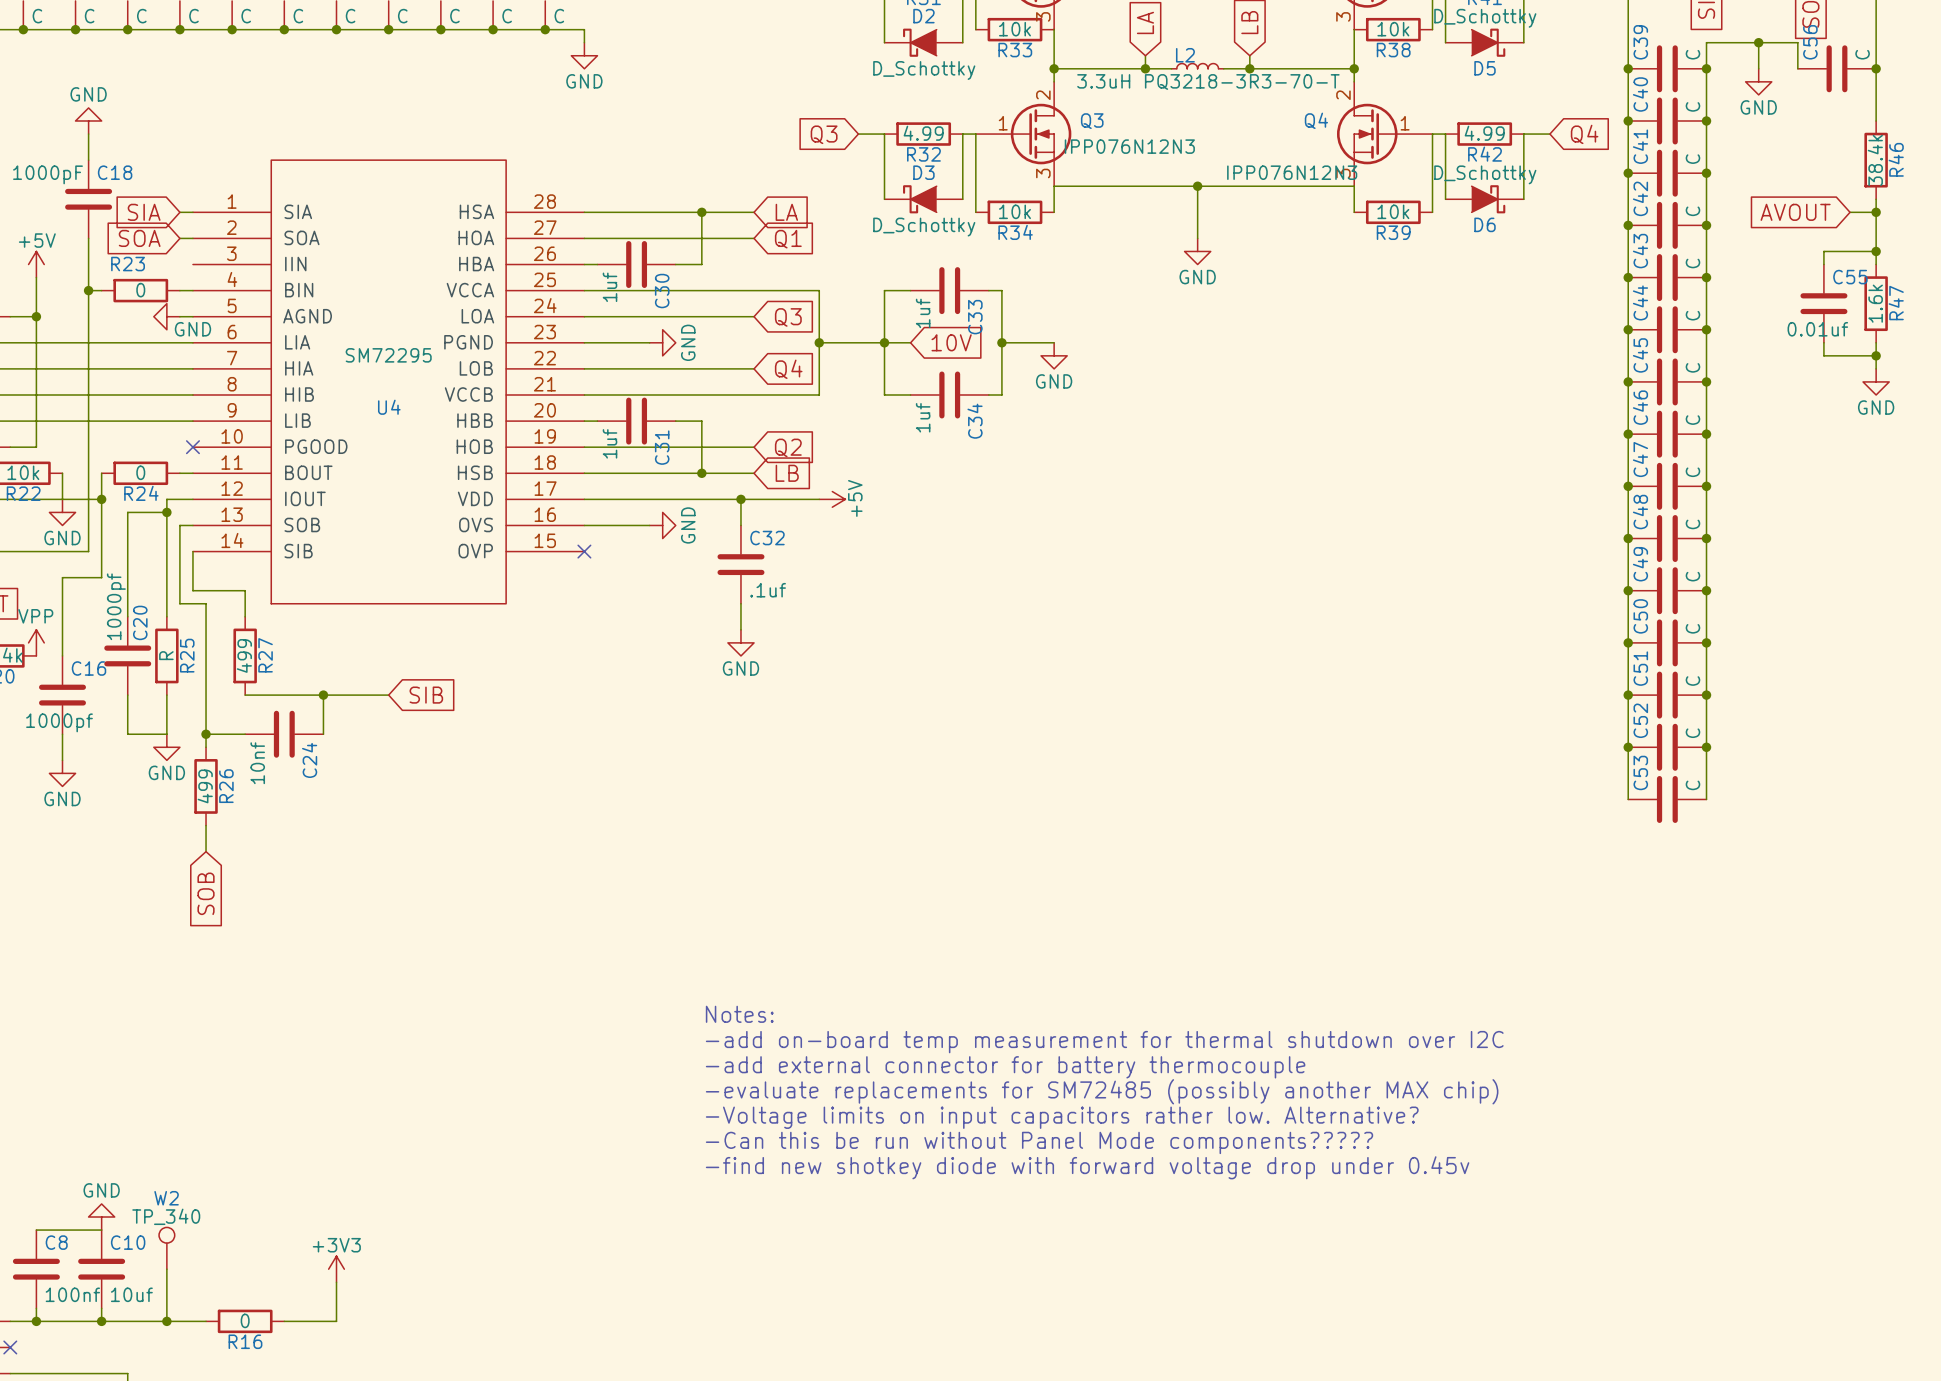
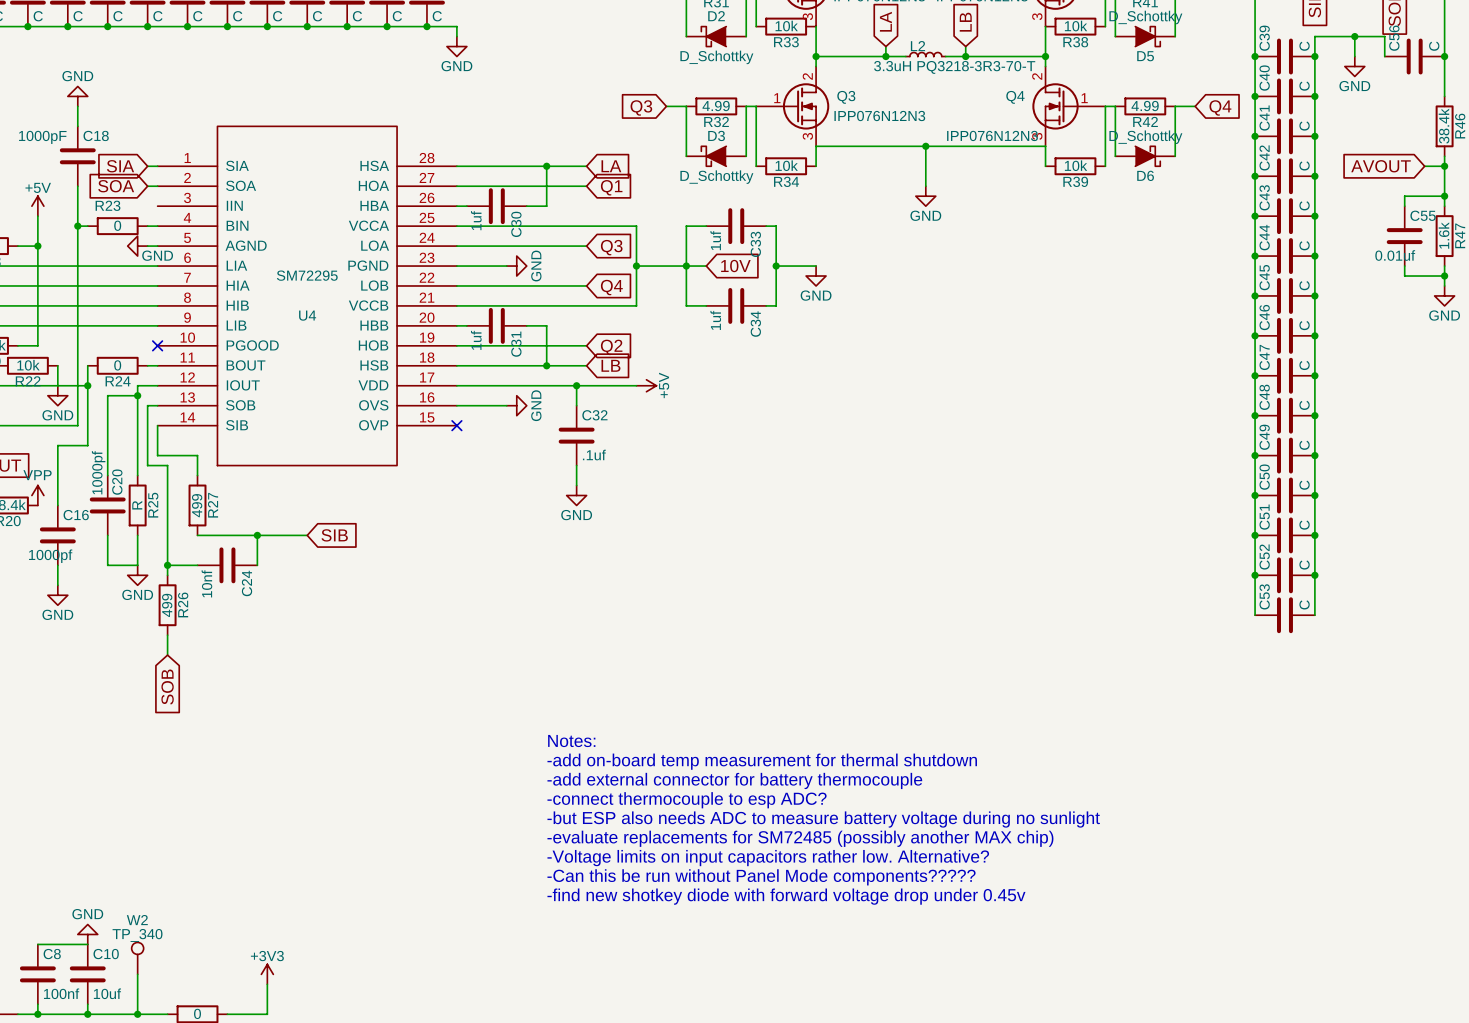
text: none -> Notes: (571, 741)
text: none -> -add on-board temp measurement for thermal shutdown (762, 761)
text: Notes: (739, 1014) -> -add external connector for battery thermocouple (734, 780)
text: -add on-board temp measurement for thermal shutdown over I2C (1104, 1042) -> -connect thermocouple to esp ADC? (687, 800)
text: -add external connector for battery thermocouple (1005, 1067) -> -but ESP also needs ADC to measure battery voltage during no sunlight (823, 819)

